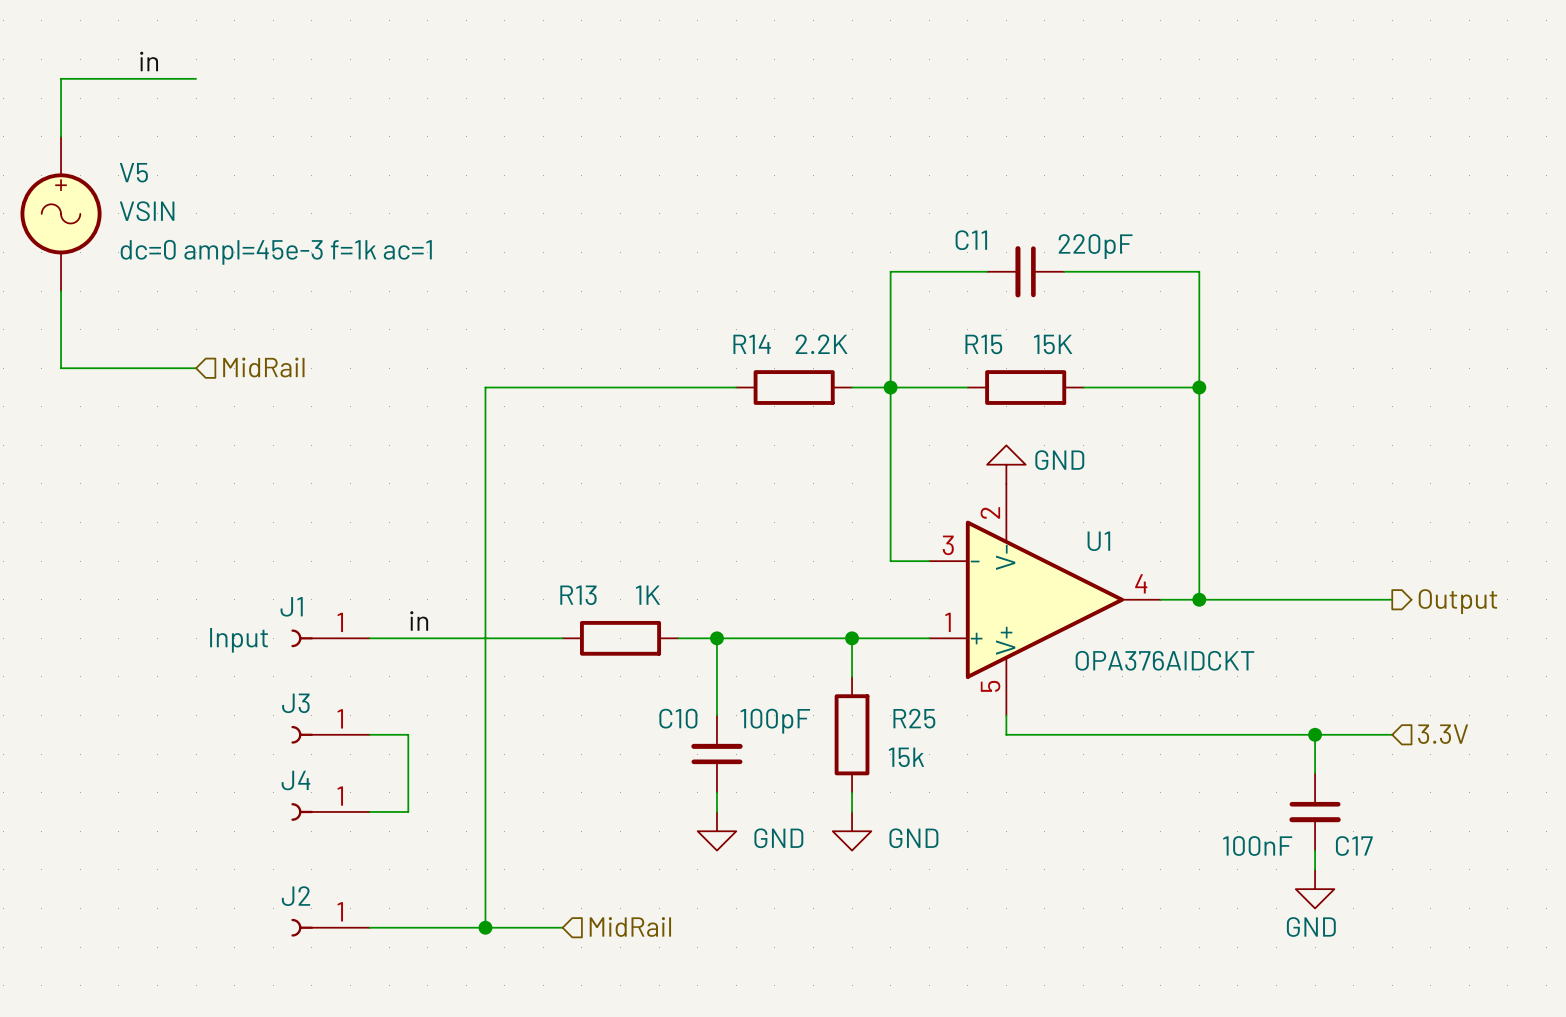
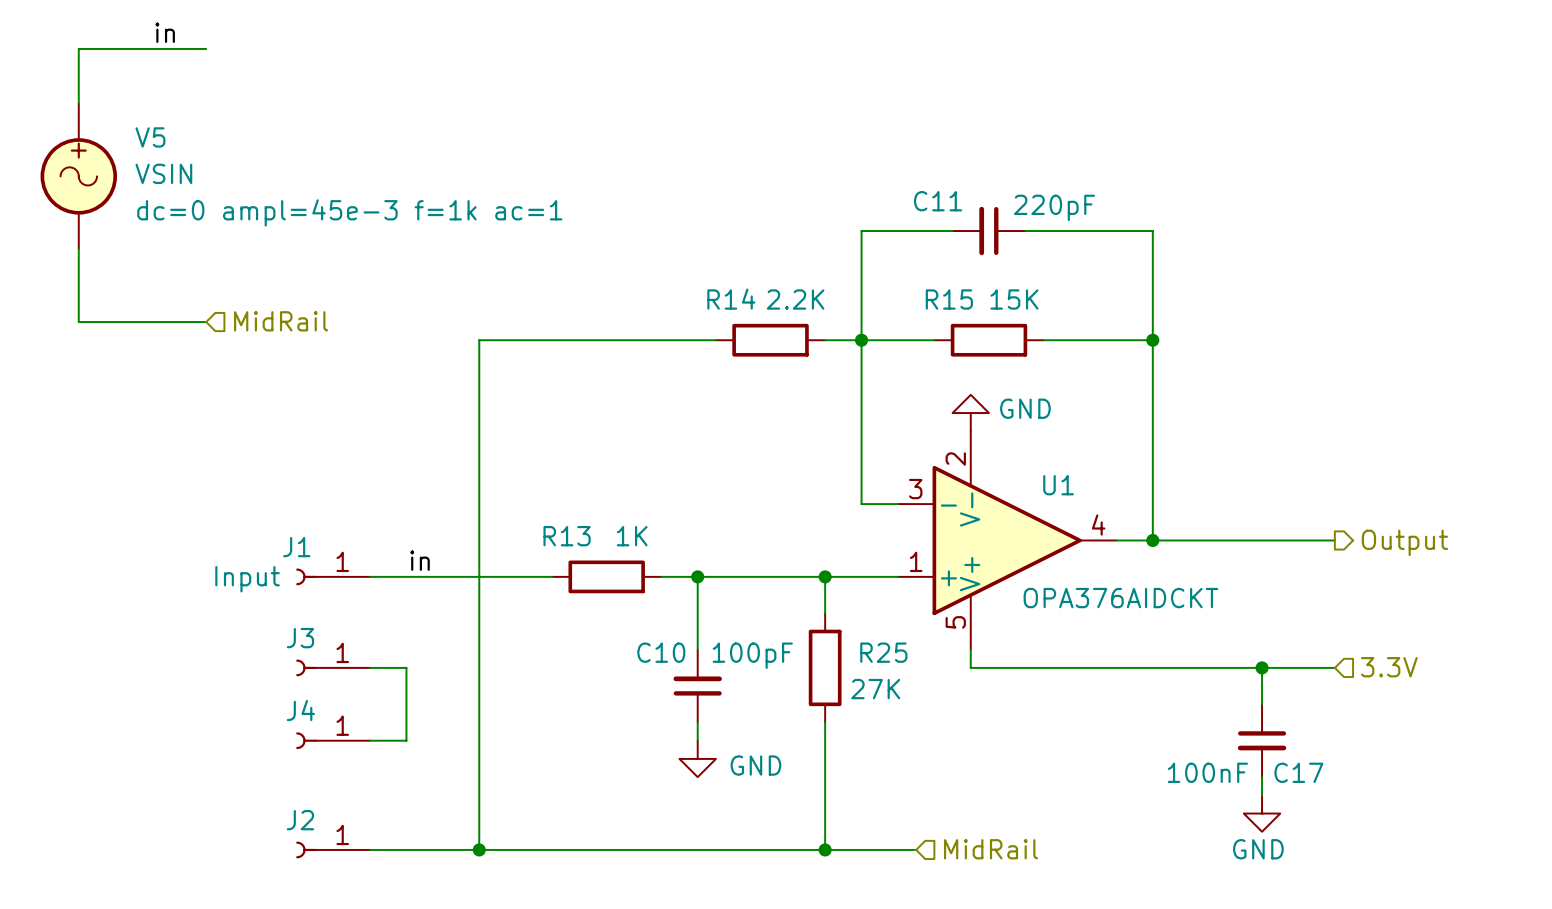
R25 value: 15k (906, 757) -> 27K (875, 689)
wire: none -> (825, 740) (825, 849)
power symbol: GND (852, 831) -> none
hierarchical label: MidRail (630, 926) -> none
hierarchical label: none -> MidRail (991, 849)
wire: none -> (552, 849) (916, 849)
junction: none -> (825, 849)

